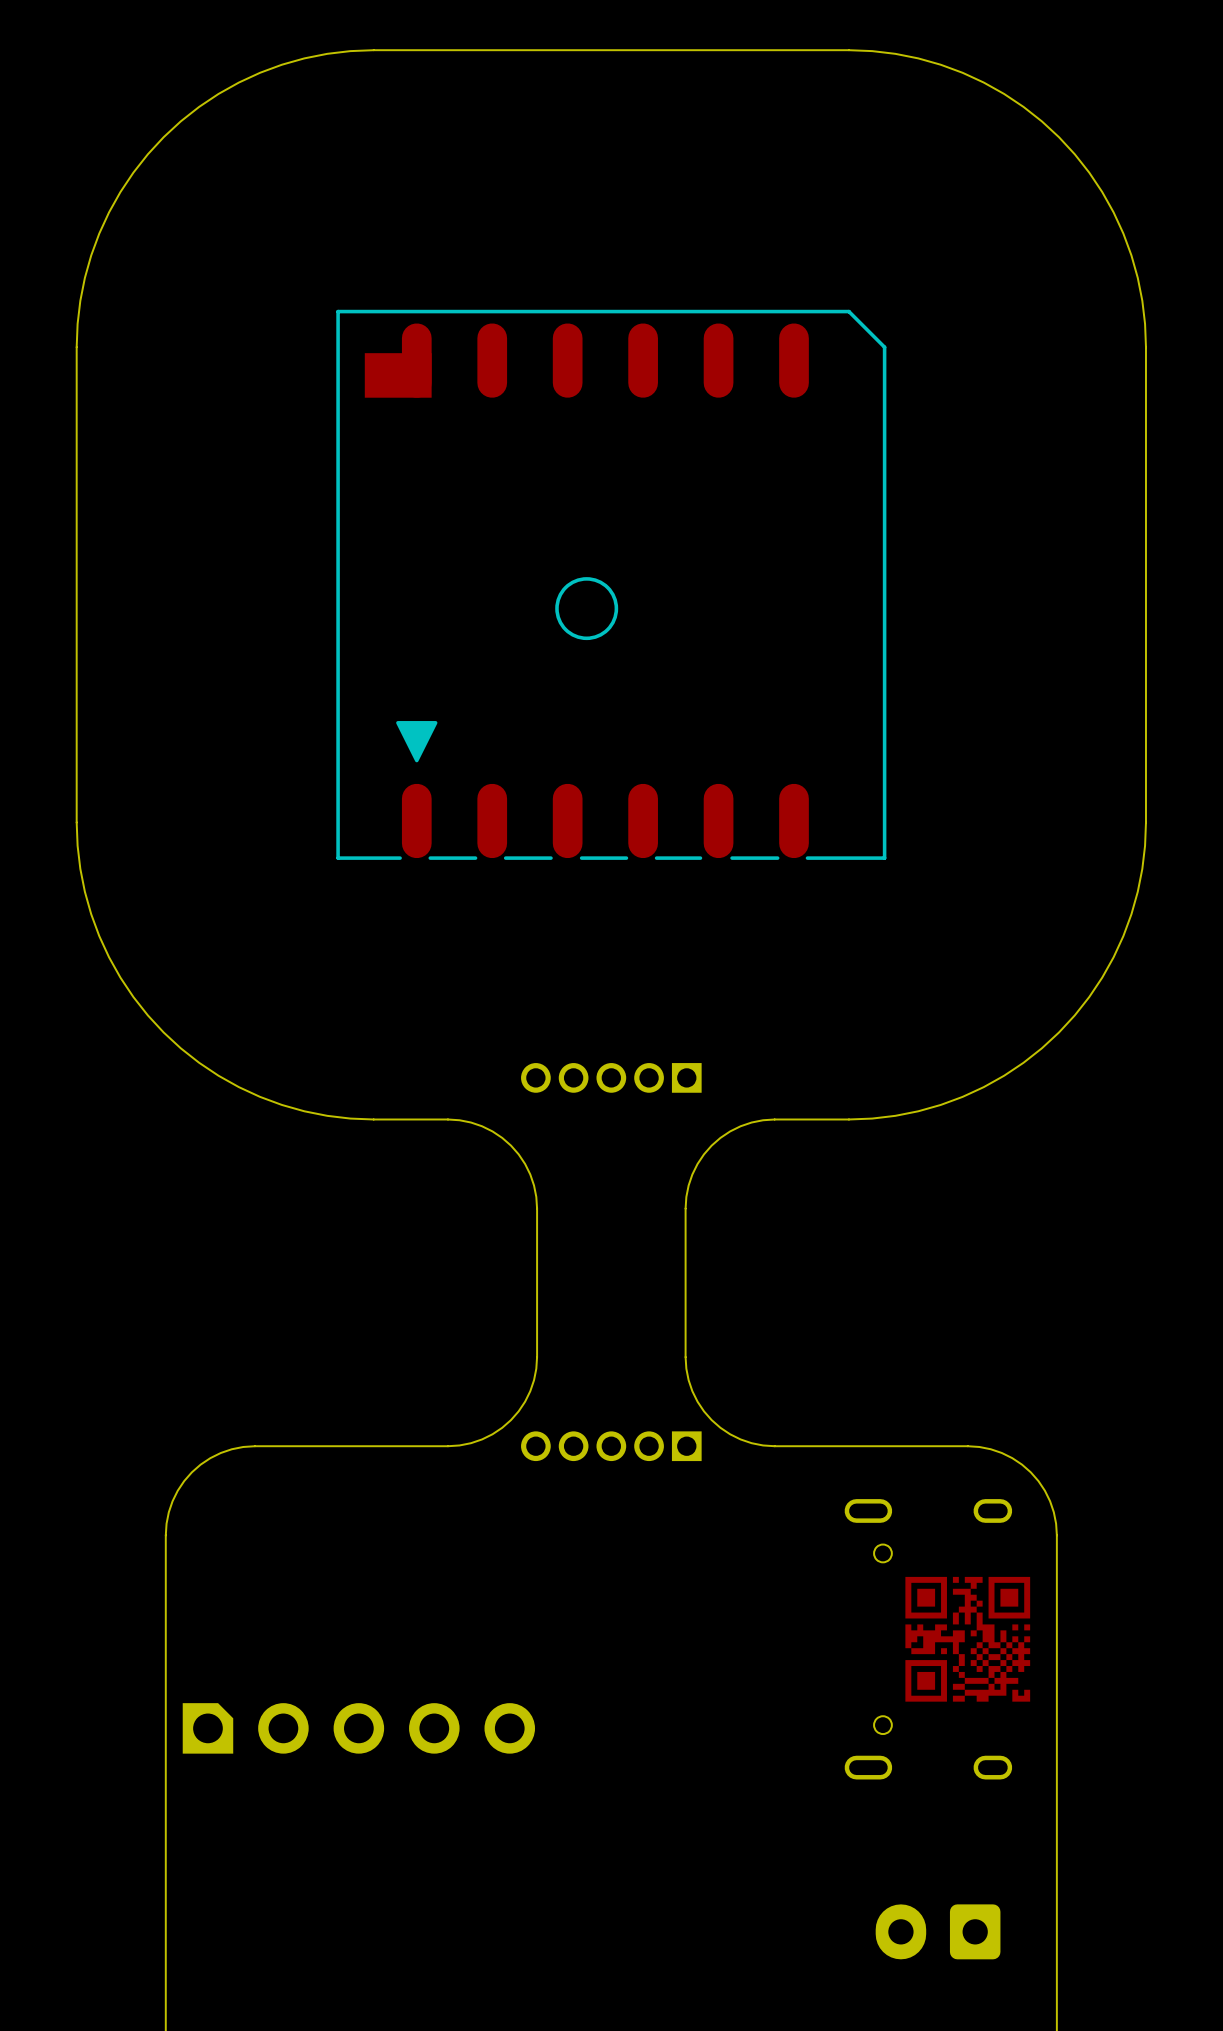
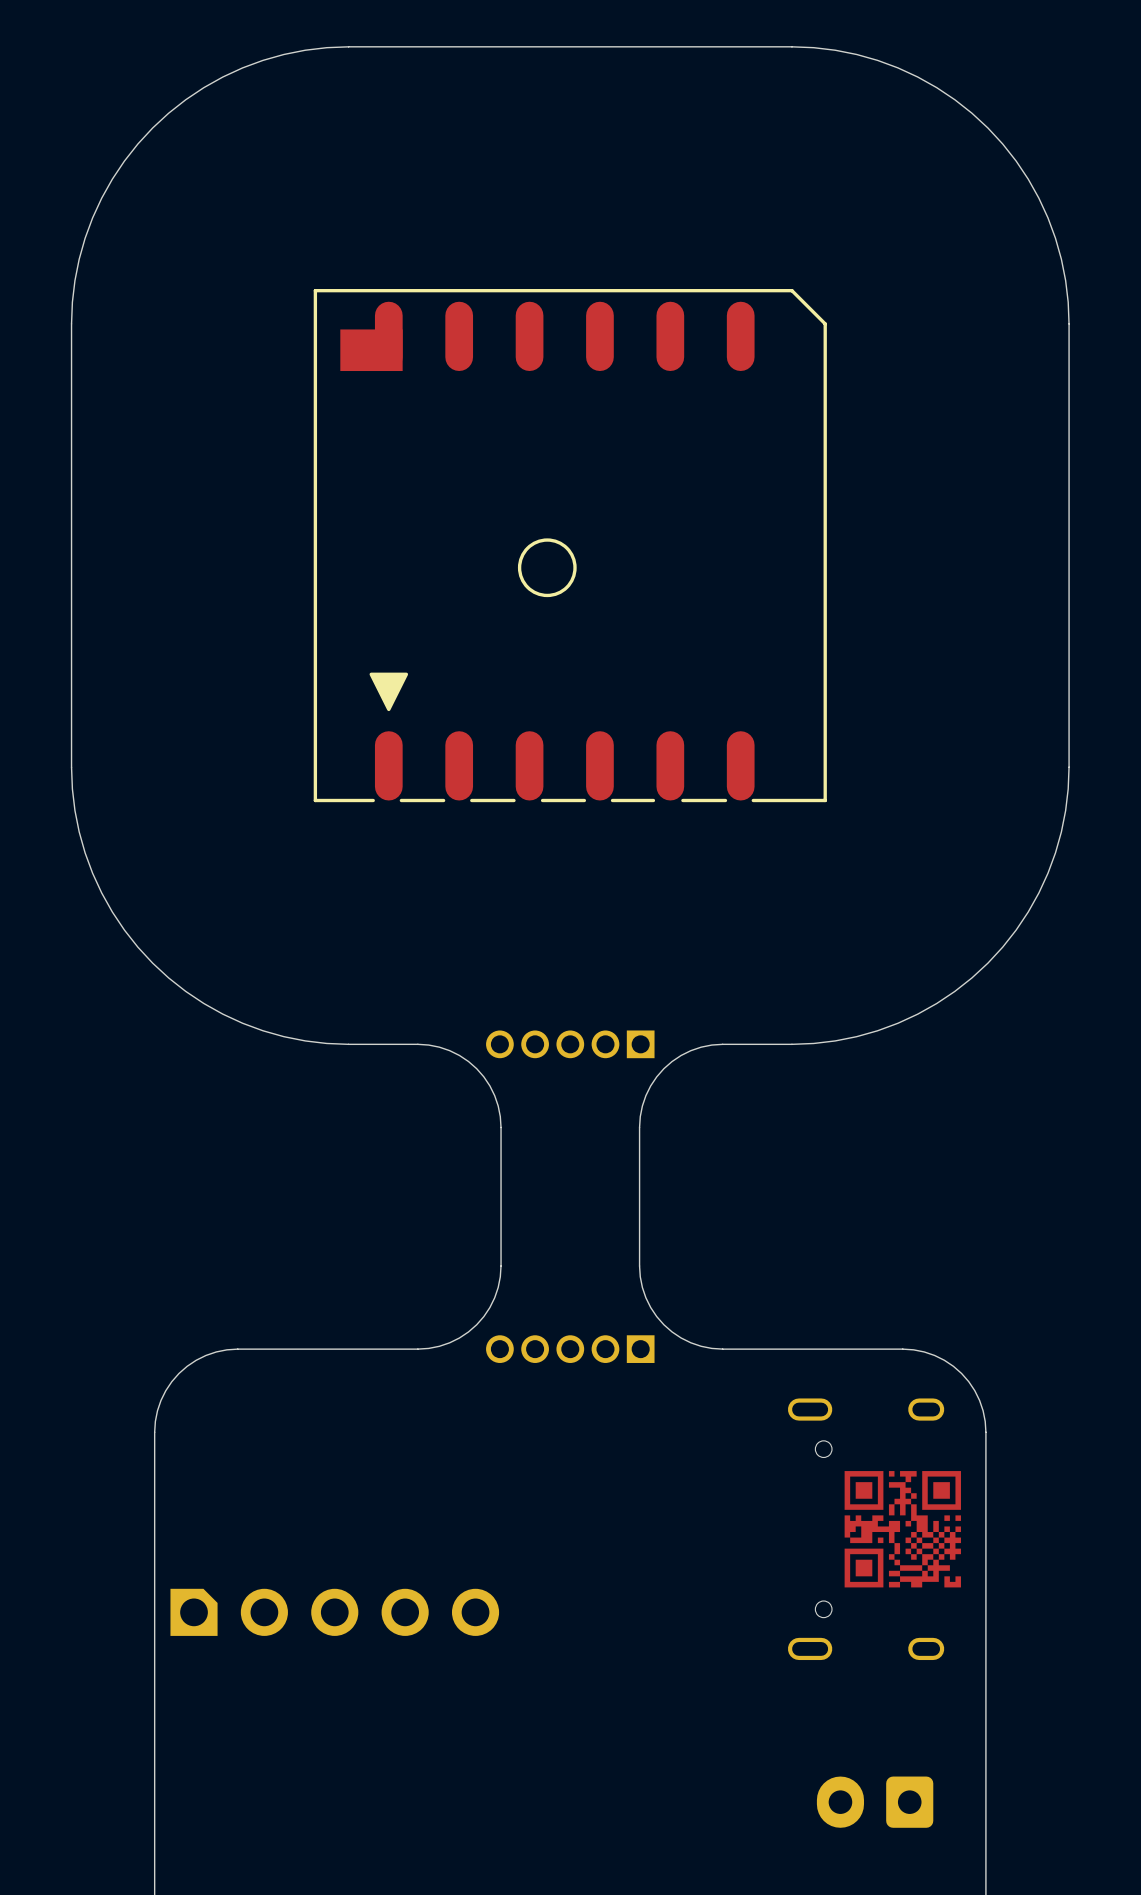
part position: (611, 1077) -> (570, 1044)

